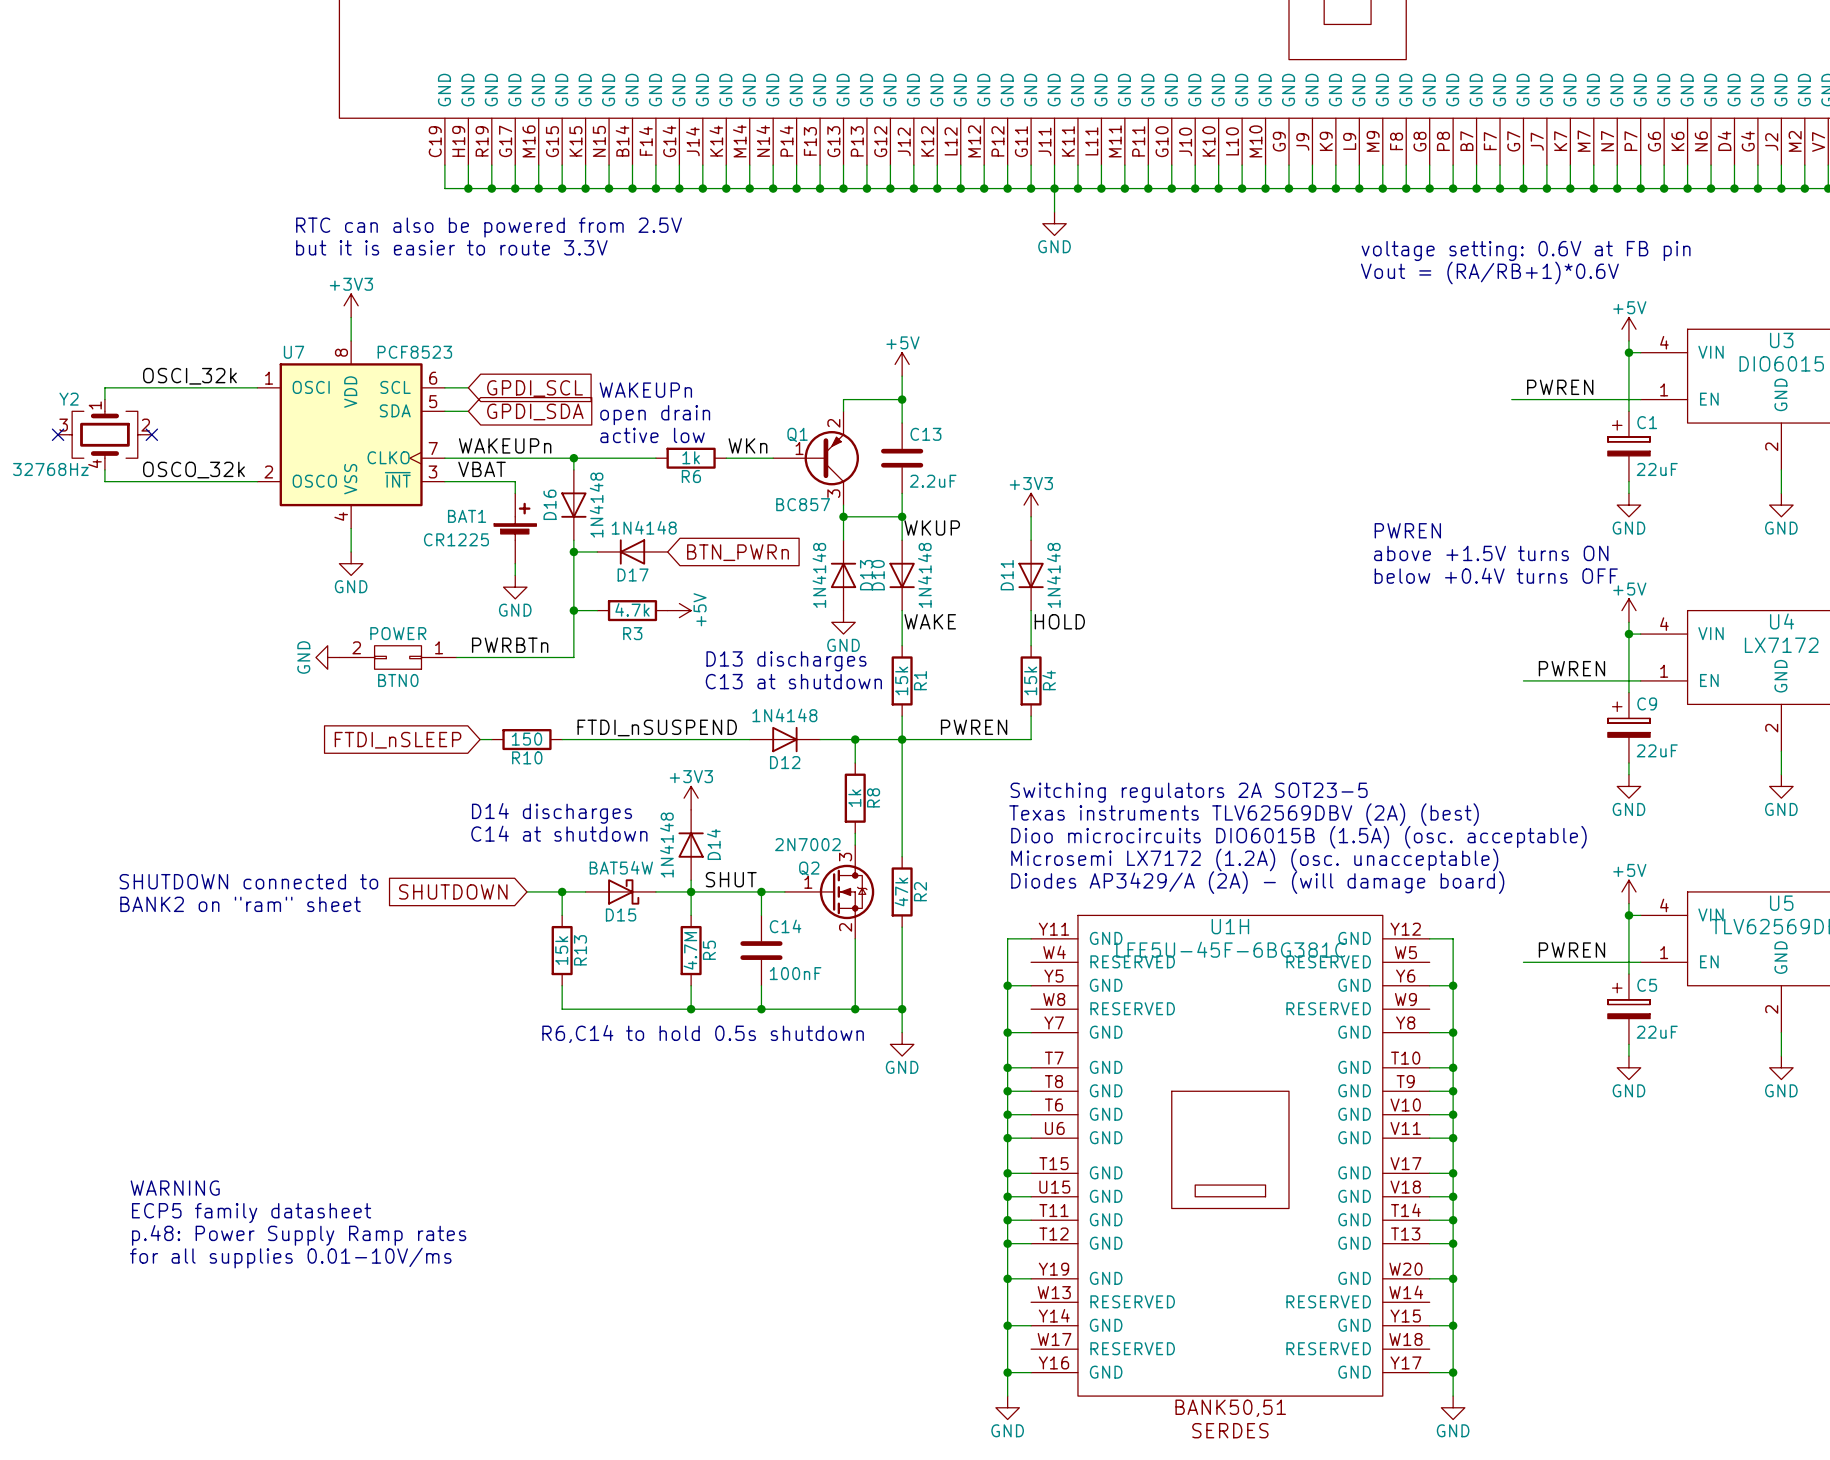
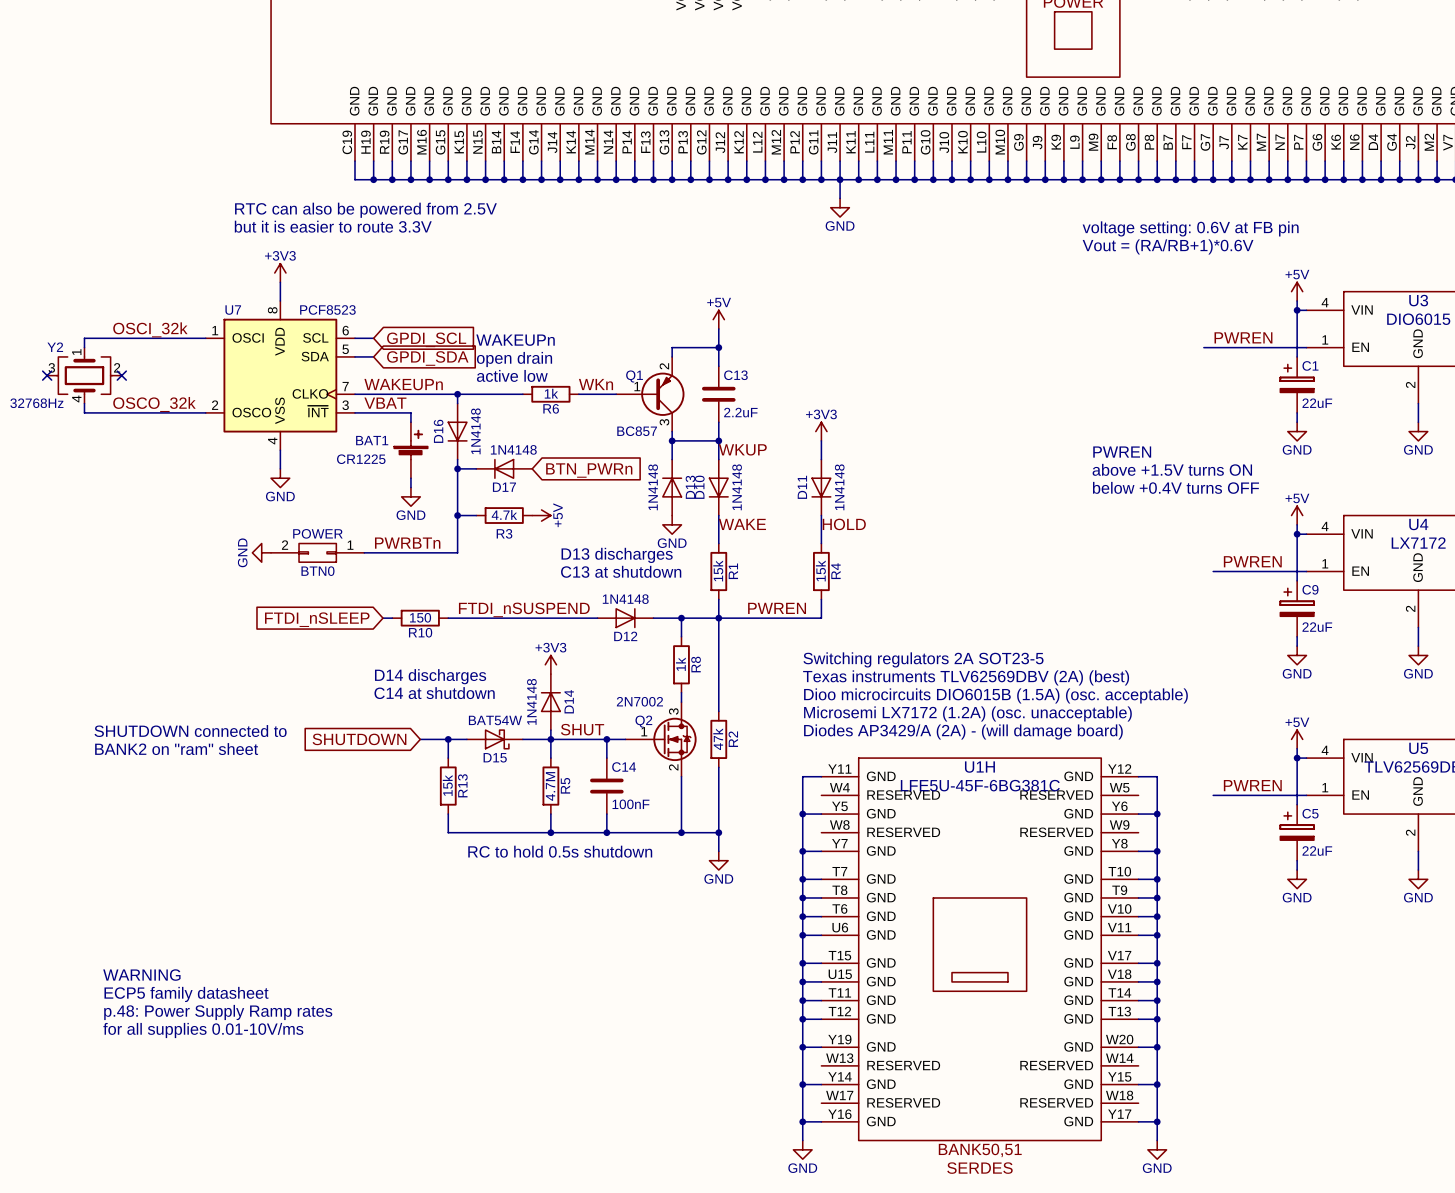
text: R6,C14 to hold 0.5s shutdown (703, 1033) -> RC to hold 0.5s shutdown (560, 851)

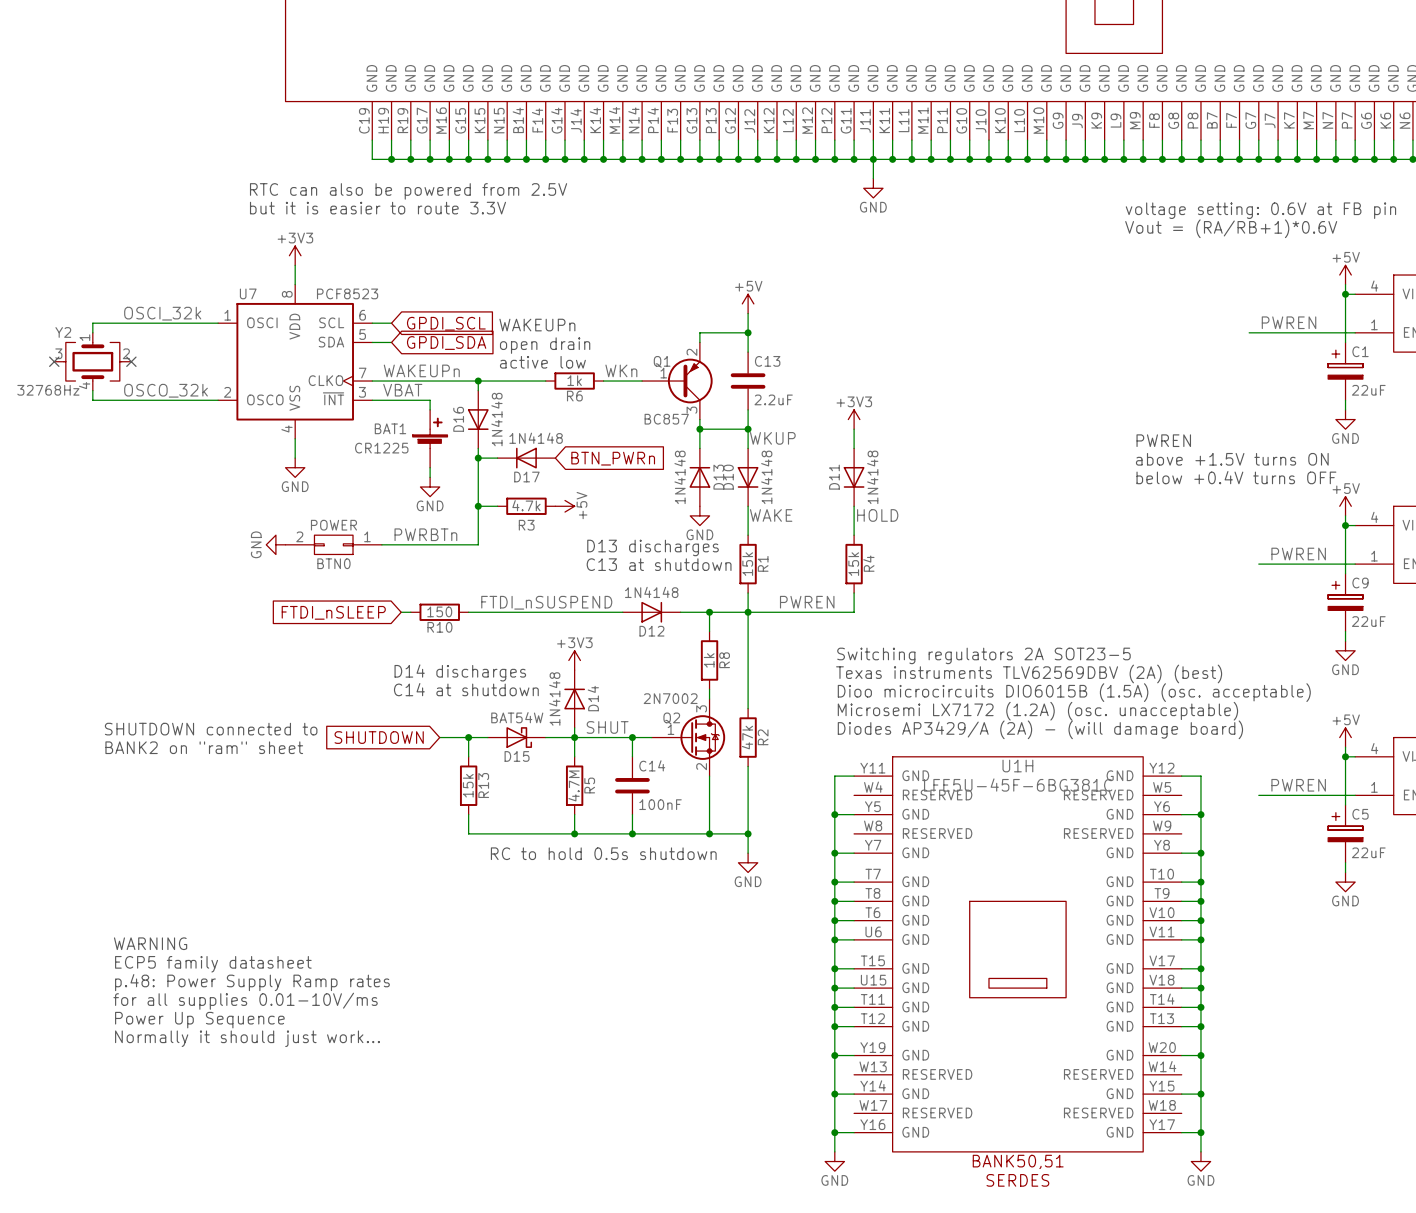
text: none -> WARNING (150, 943)
text: none -> ECP5 family datasheet (213, 964)
text: WARNING (141, 975) -> p.48: Power Supply Ramp rates (252, 982)
text: ECP5 family datasheet (186, 994) -> for all supplies 0.01-10V/ms (245, 1001)
text: p.48: Power Supply Ramp rates (218, 1012) -> Power Up Sequence (199, 1020)
text: for all supplies 0.01-10V/ms (203, 1030) -> Normally it should just work... (247, 1038)

